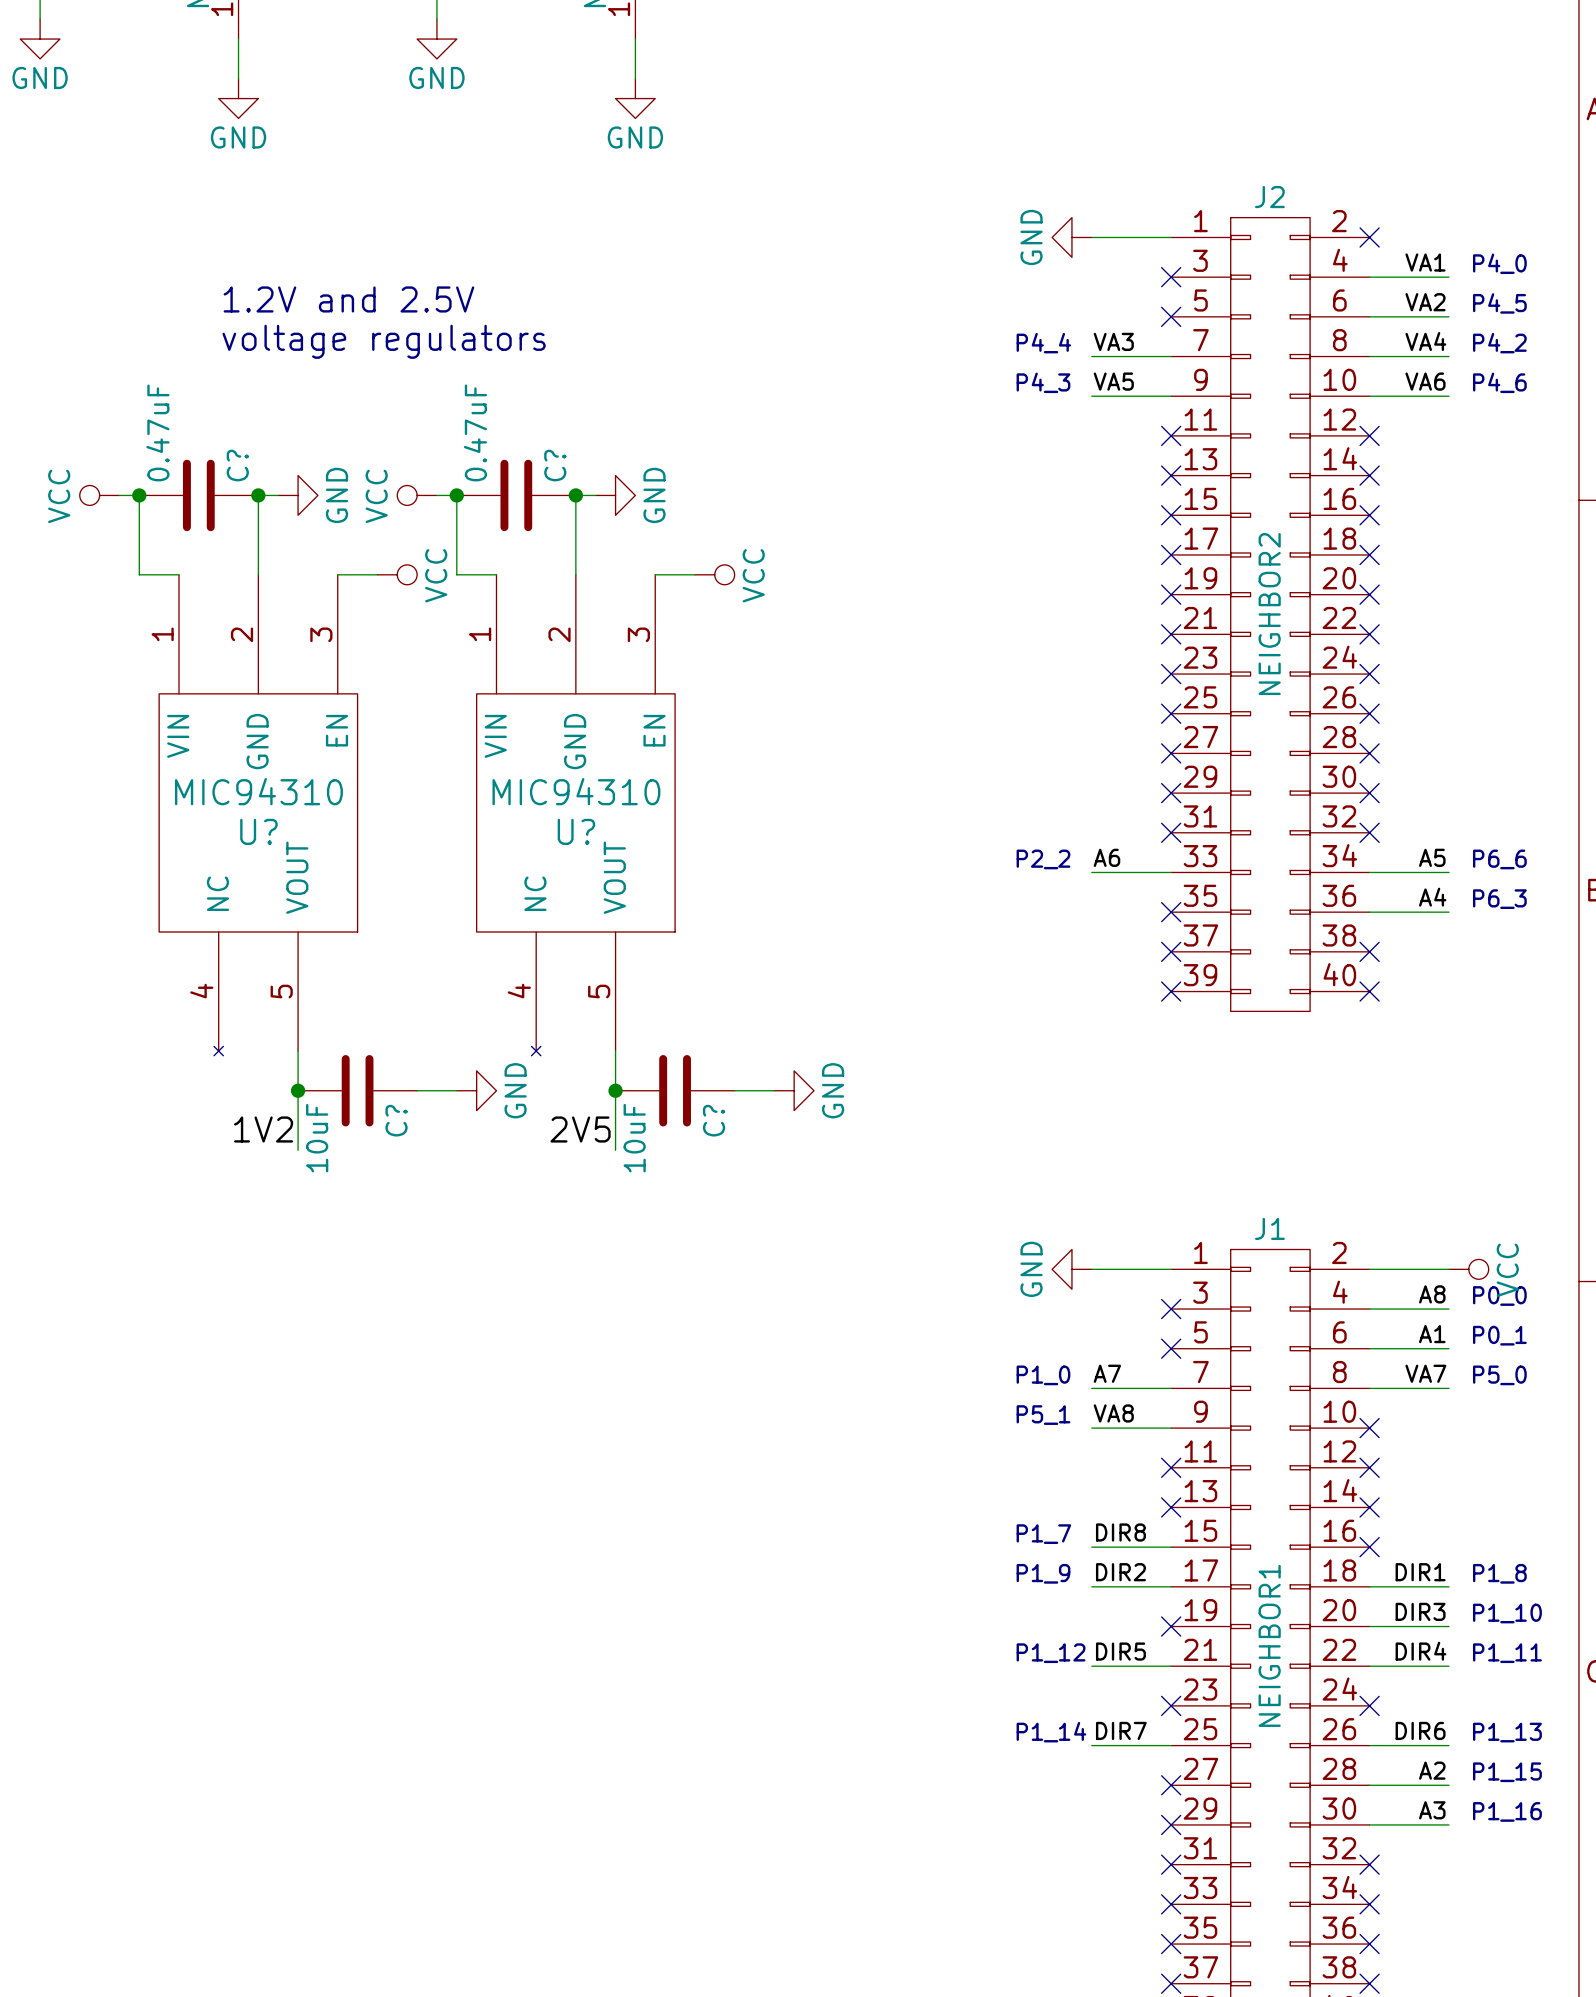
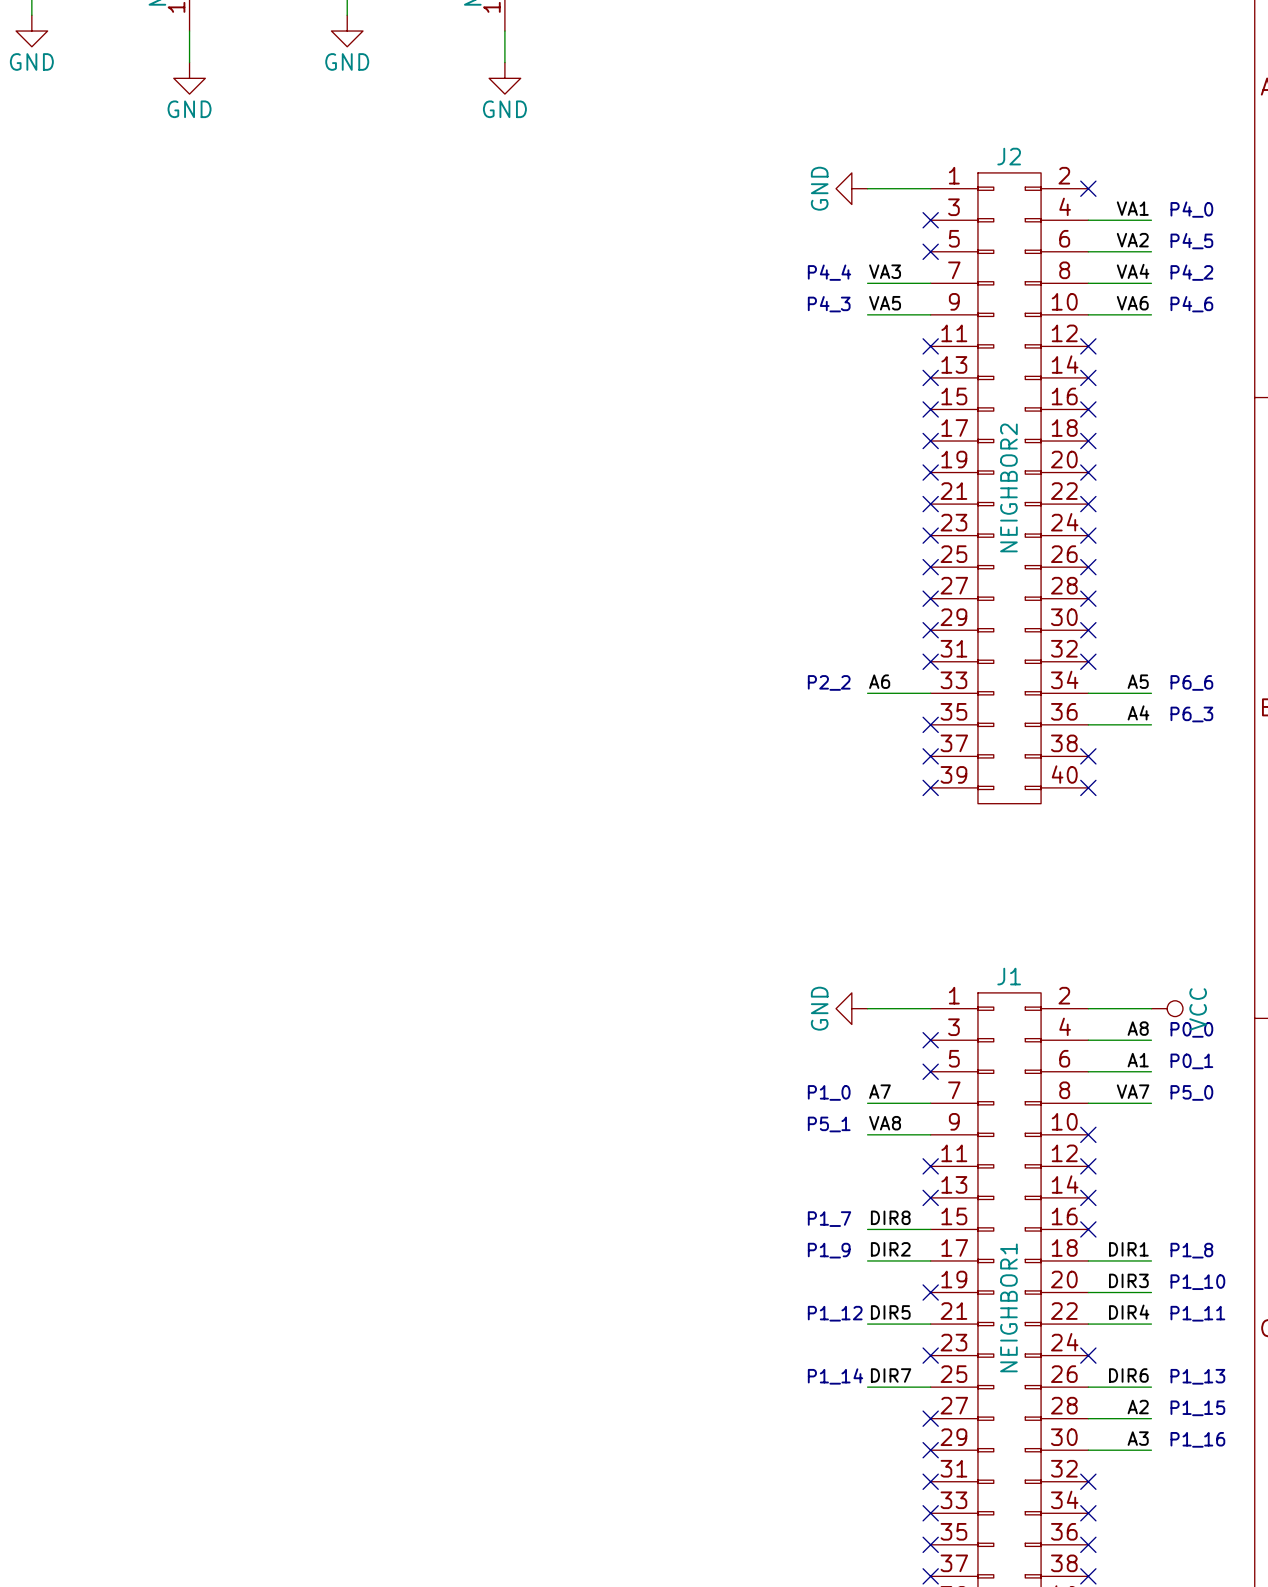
text: 1.2V and 2.5V (348, 299) -> none
text: voltage regulators (384, 341) -> none
power symbol: VCC (99, 495) -> none
wire: (119, 495) (139, 495) (139, 574) (178, 574) -> none
junction: (139, 495) -> none
C?: 0.47uF (198, 495) -> none
junction: (258, 495) -> none
wire: (278, 495) (258, 495) (258, 574) -> none
power symbol: GND (298, 495) -> none
power symbol: VCC (417, 495) -> none
wire: (436, 495) (456, 495) (456, 574) (496, 574) -> none
junction: (456, 495) -> none
C?: 0.47uF (516, 495) -> none
junction: (575, 495) -> none
wire: (595, 495) (575, 495) (575, 574) -> none
power symbol: GND (615, 495) -> none
wire: (337, 574) (377, 574) -> none
power symbol: VCC (397, 574) -> none
wire: (655, 574) (694, 574) -> none
power symbol: VCC (714, 574) -> none
U?: MIC94310 (258, 815) -> none
U?: MIC94310 (575, 815) -> none
wire: (298, 1051) (298, 1150) -> none
wire: (615, 1051) (615, 1150) -> none
junction: (298, 1090) -> none
C?: 10uF (357, 1090) -> none
wire: (417, 1090) (456, 1090) -> none
power symbol: GND (476, 1090) -> none
junction: (615, 1090) -> none
C?: 10uF (675, 1090) -> none
wire: (734, 1090) (774, 1090) -> none
power symbol: GND (794, 1090) -> none
label: 1V2 (263, 1129) -> none
label: 2V5 (580, 1129) -> none

